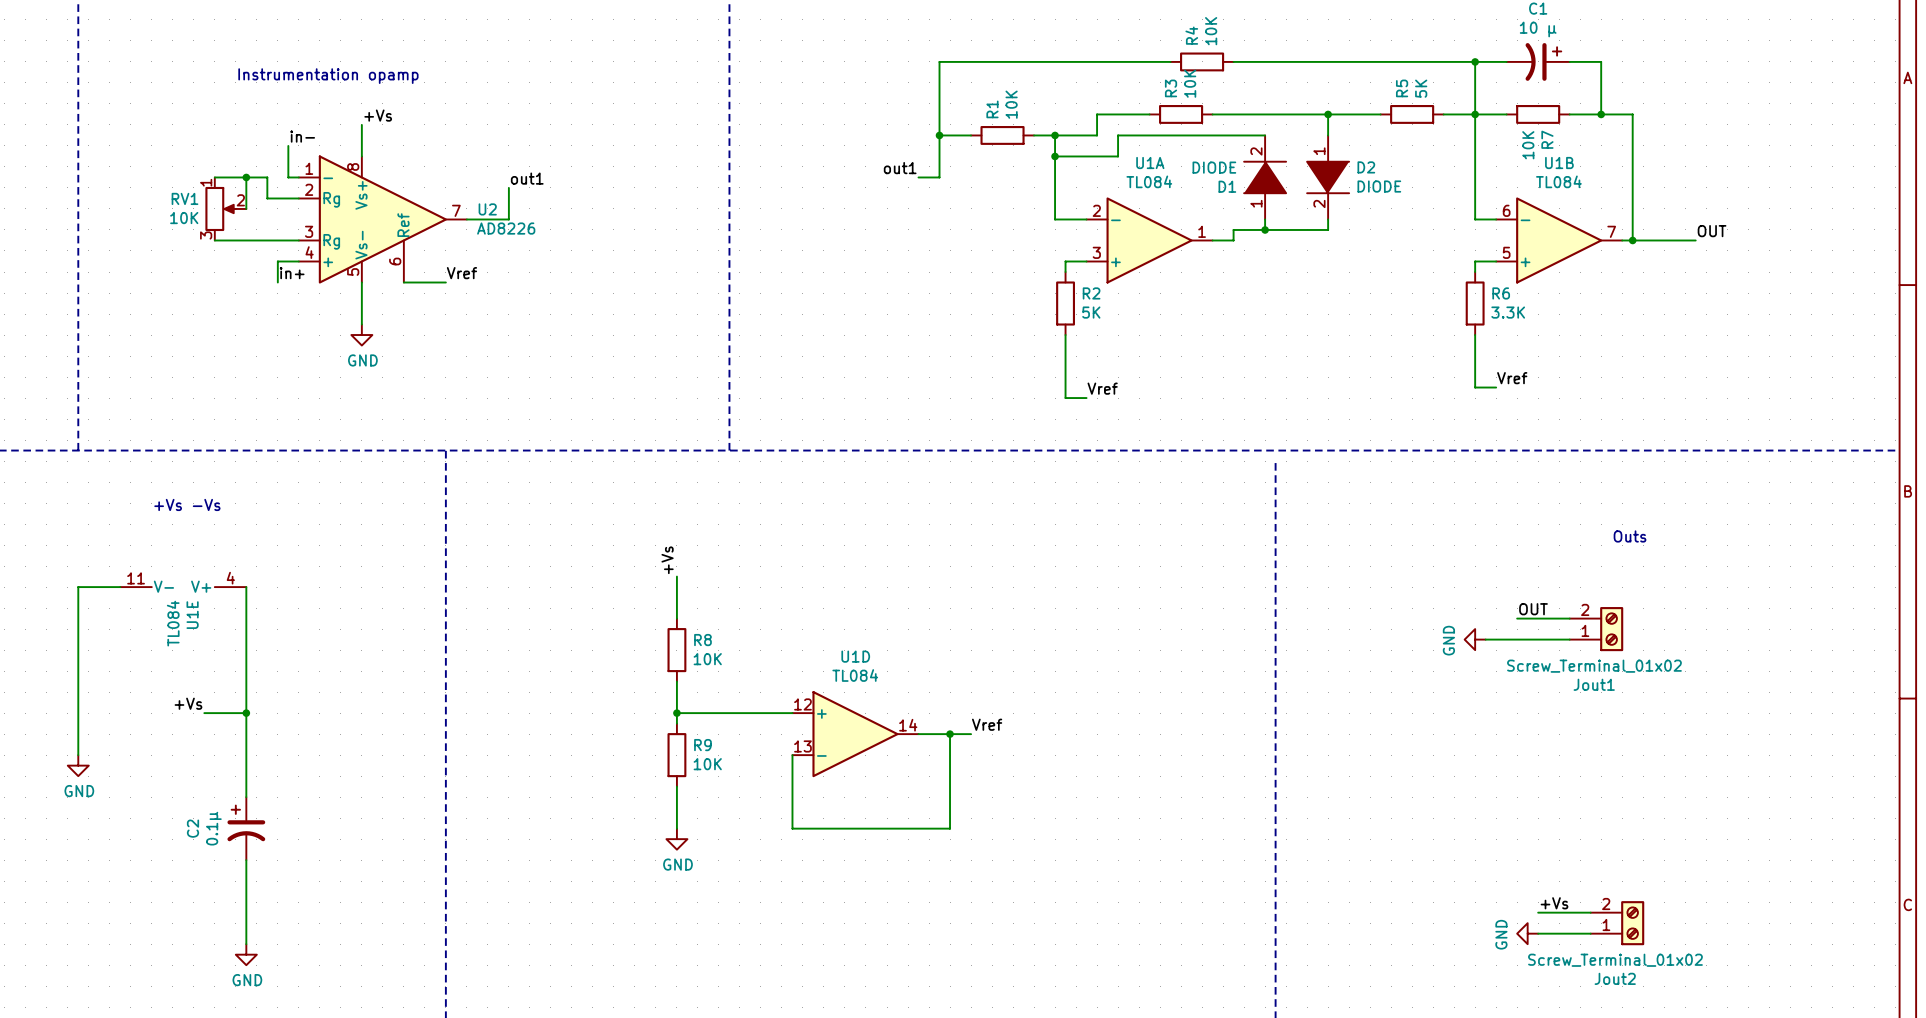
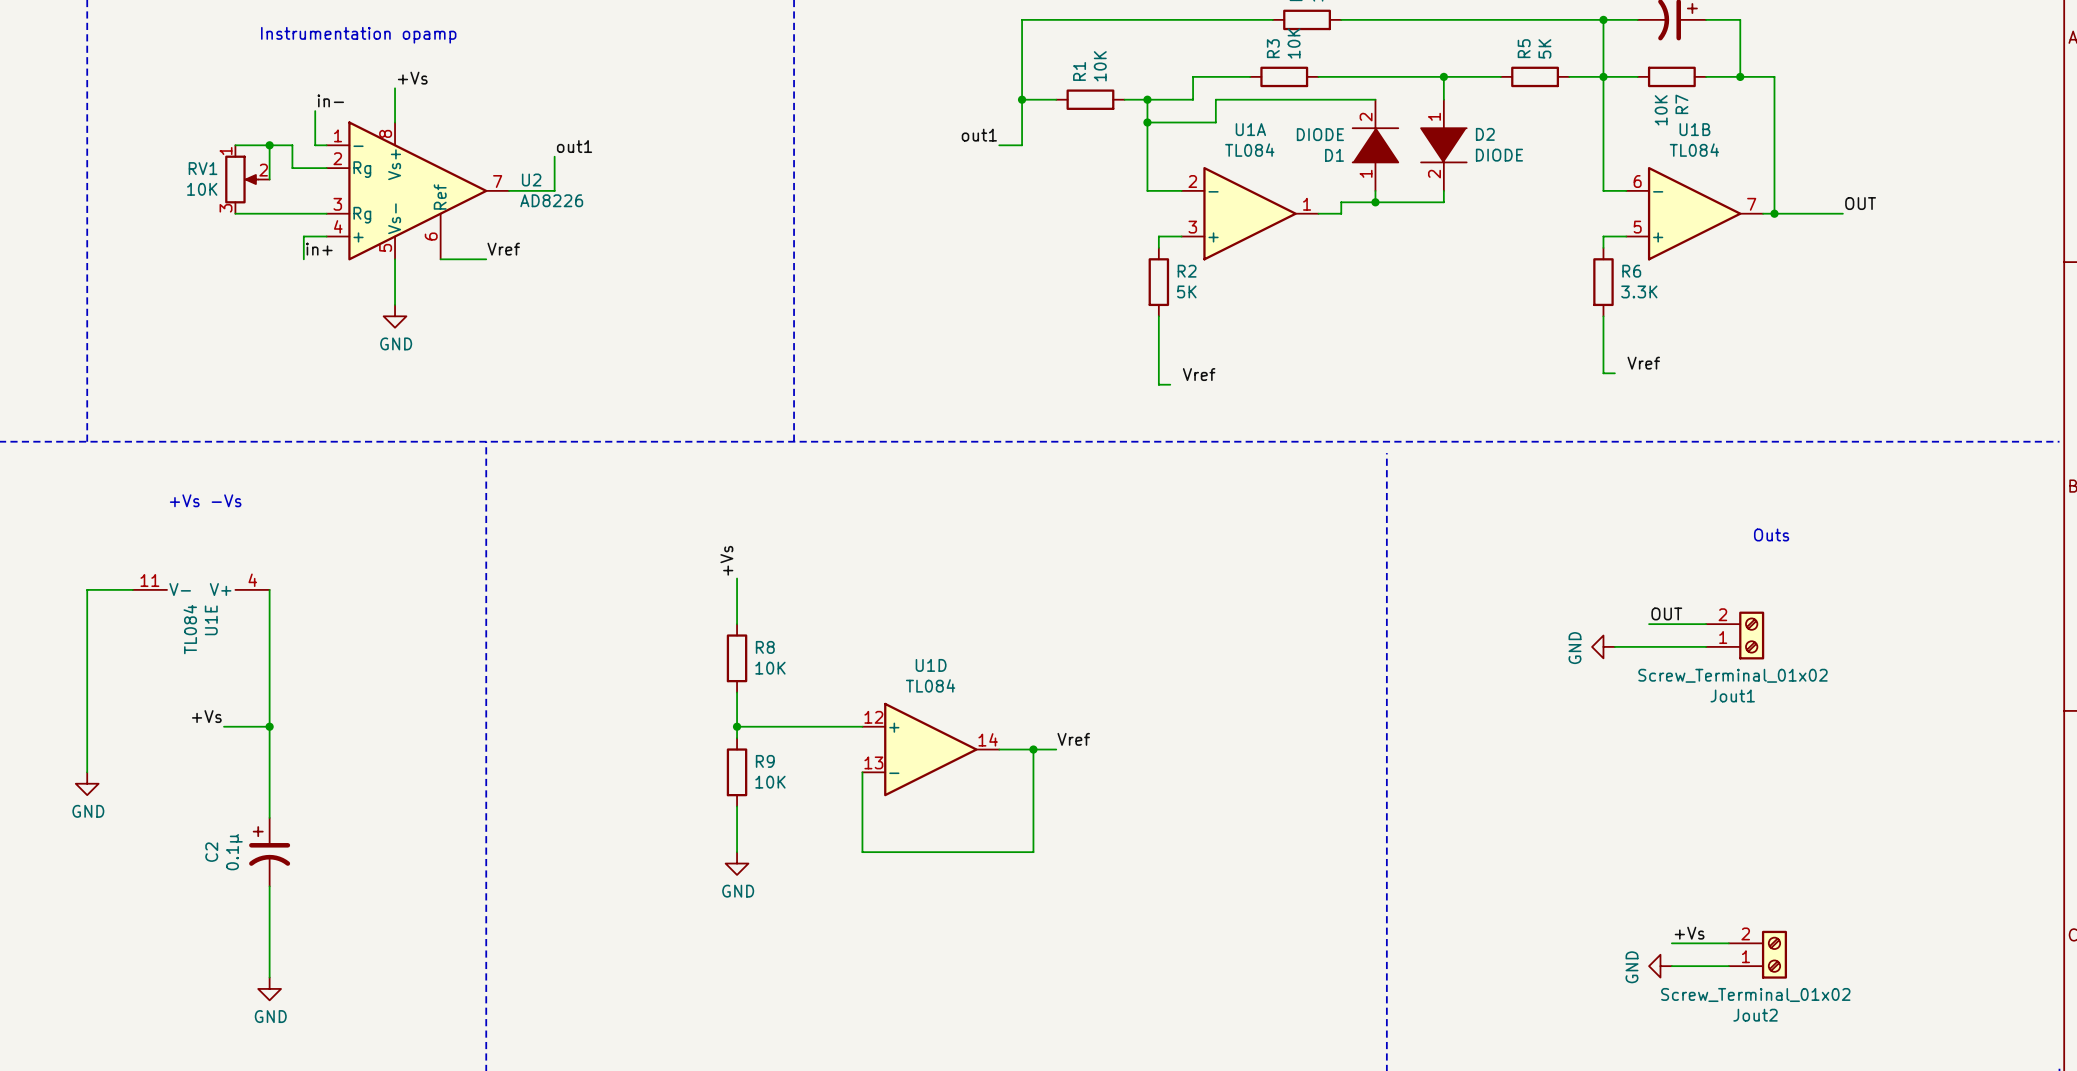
wire: (1485, 387) (1496, 387) -> none
wire: (1076, 398) (1086, 398) -> none

